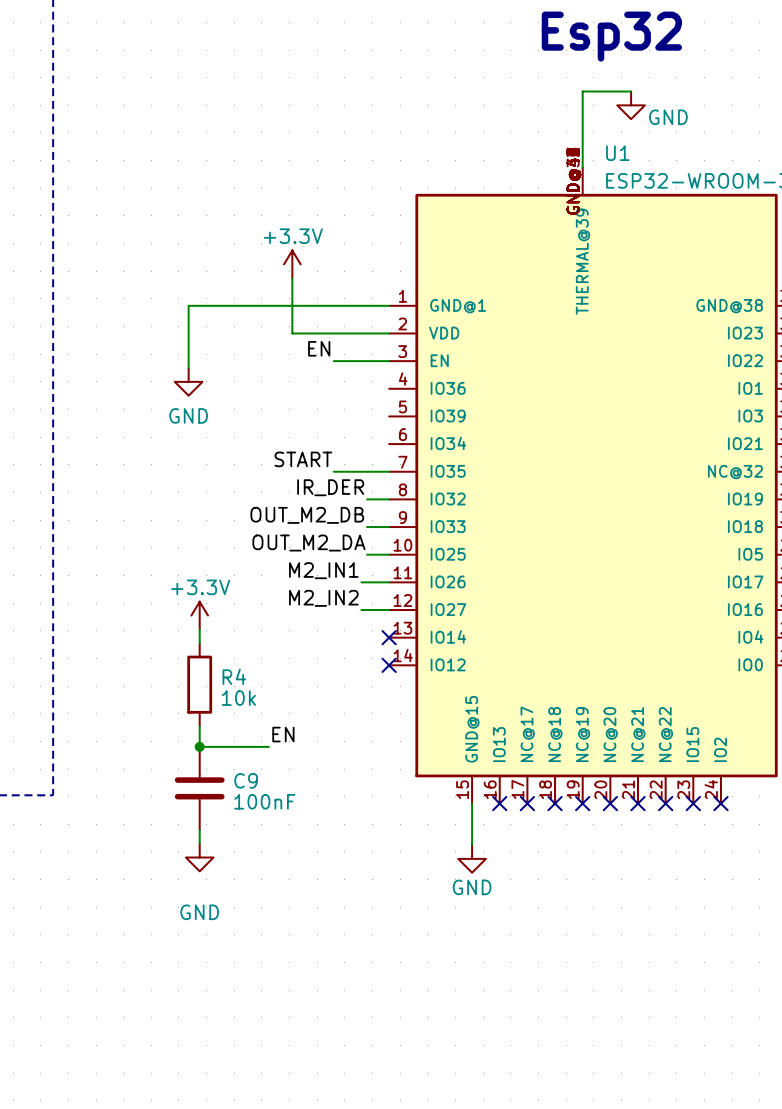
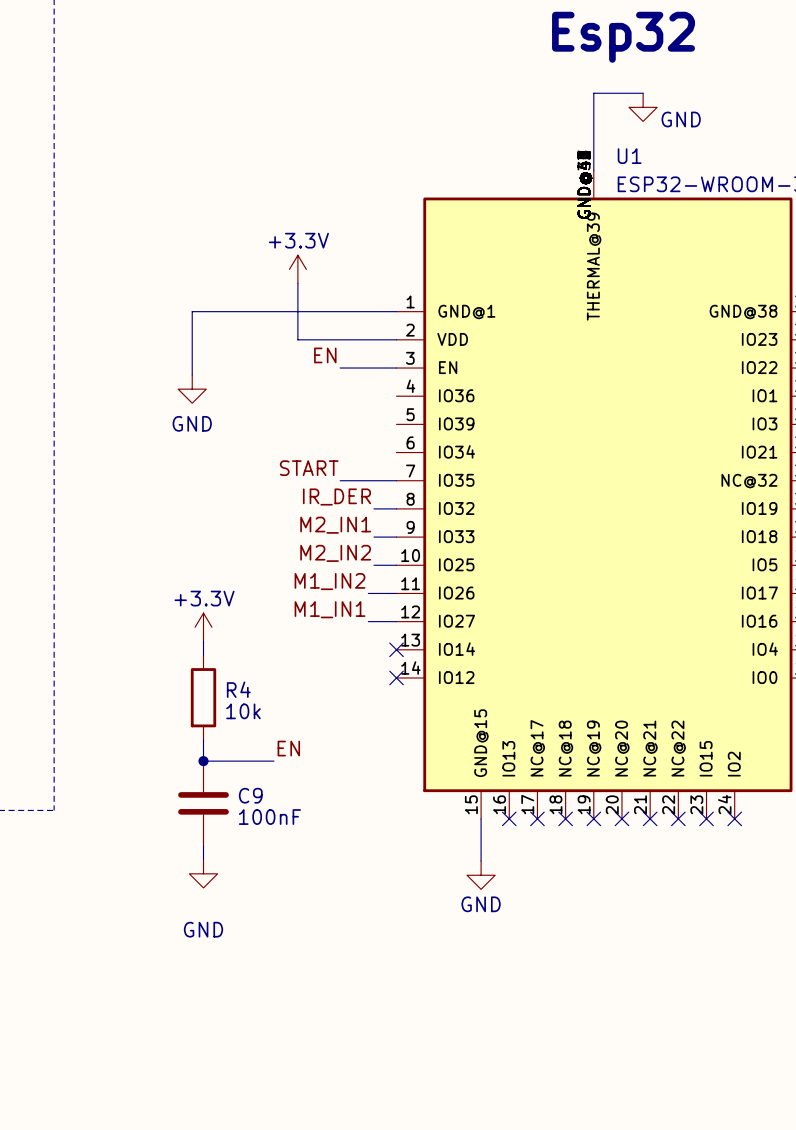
label: OUT_M2_DB (307, 515) -> M2_IN1 (335, 525)
label: OUT_M2_DA (308, 543) -> M2_IN2 (335, 553)
label: M2_IN1 (323, 570) -> M1_IN2 (330, 581)
label: M2_IN2 (323, 598) -> M1_IN1 (330, 609)

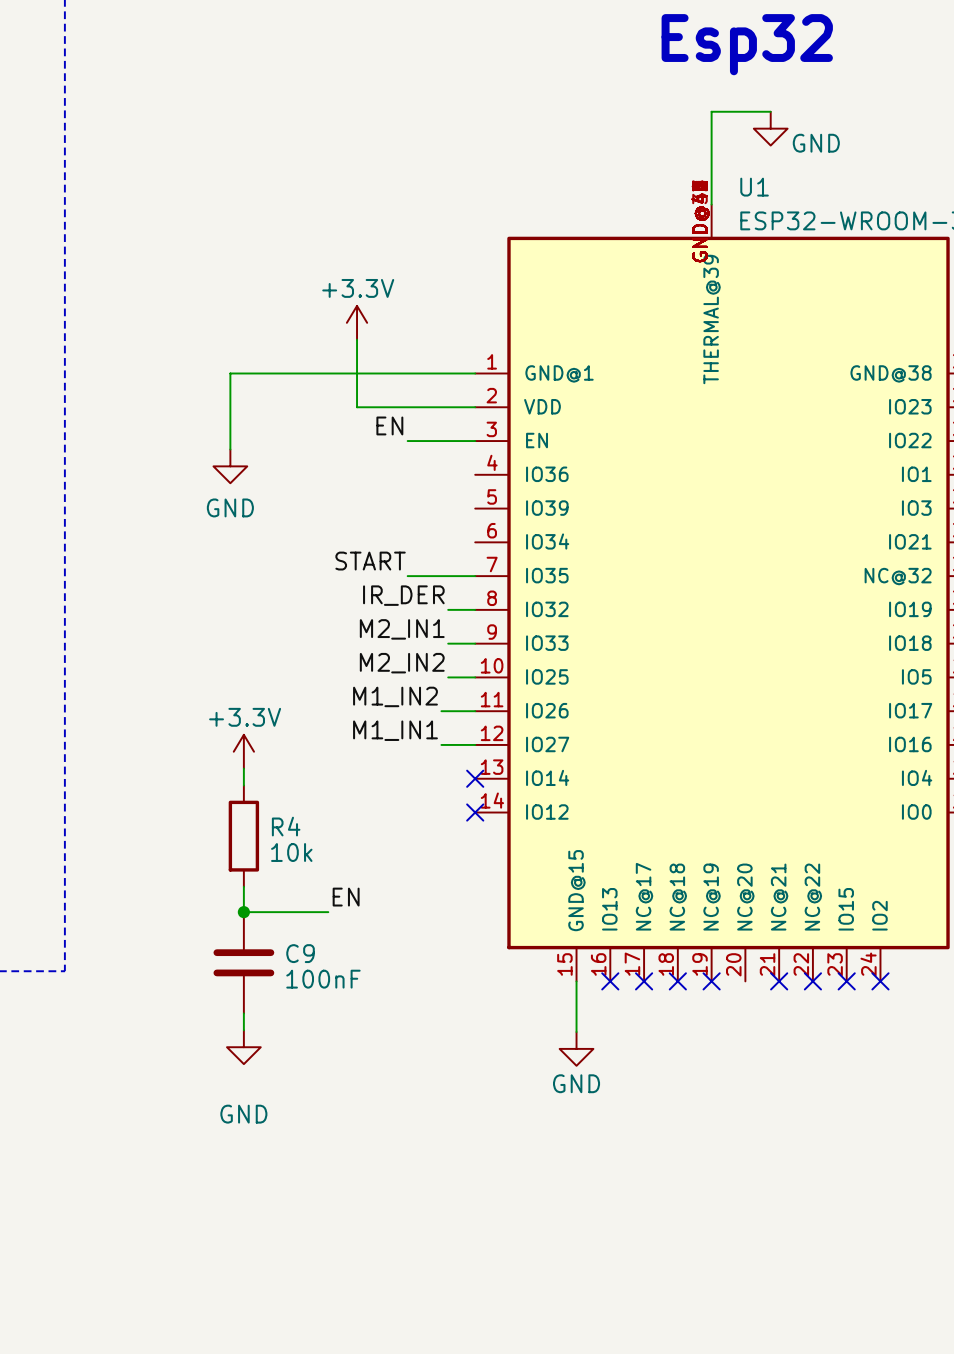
no-connect mark: (621, 818) -> none

